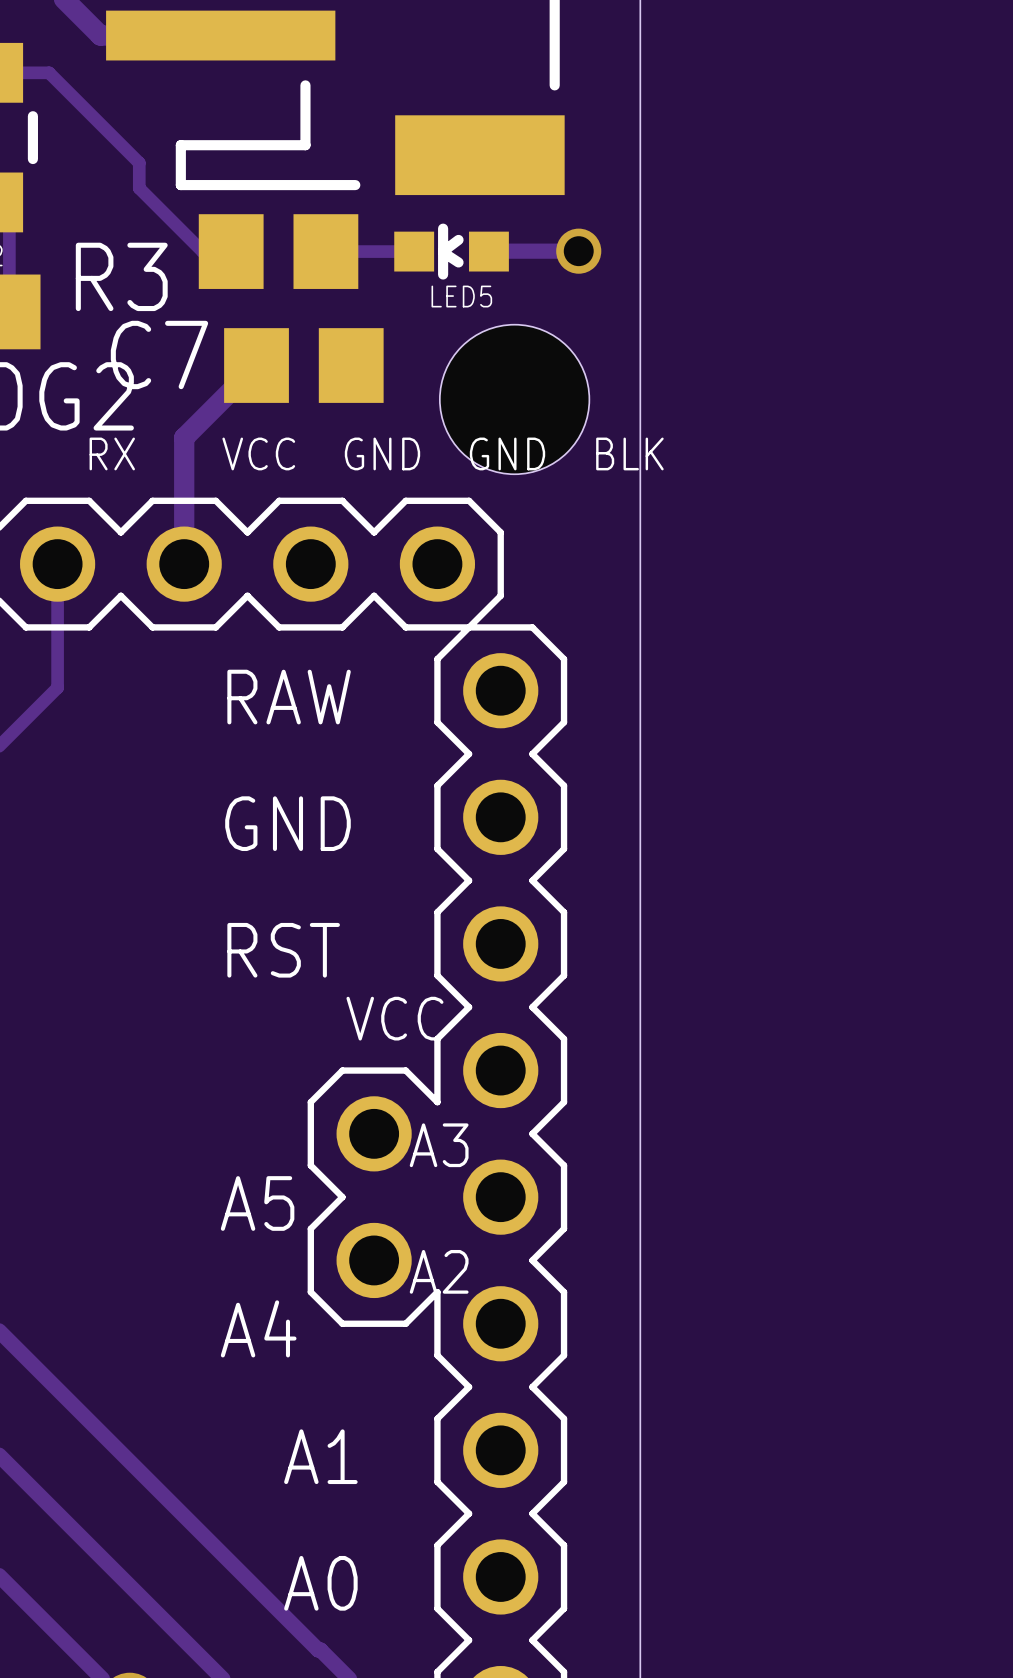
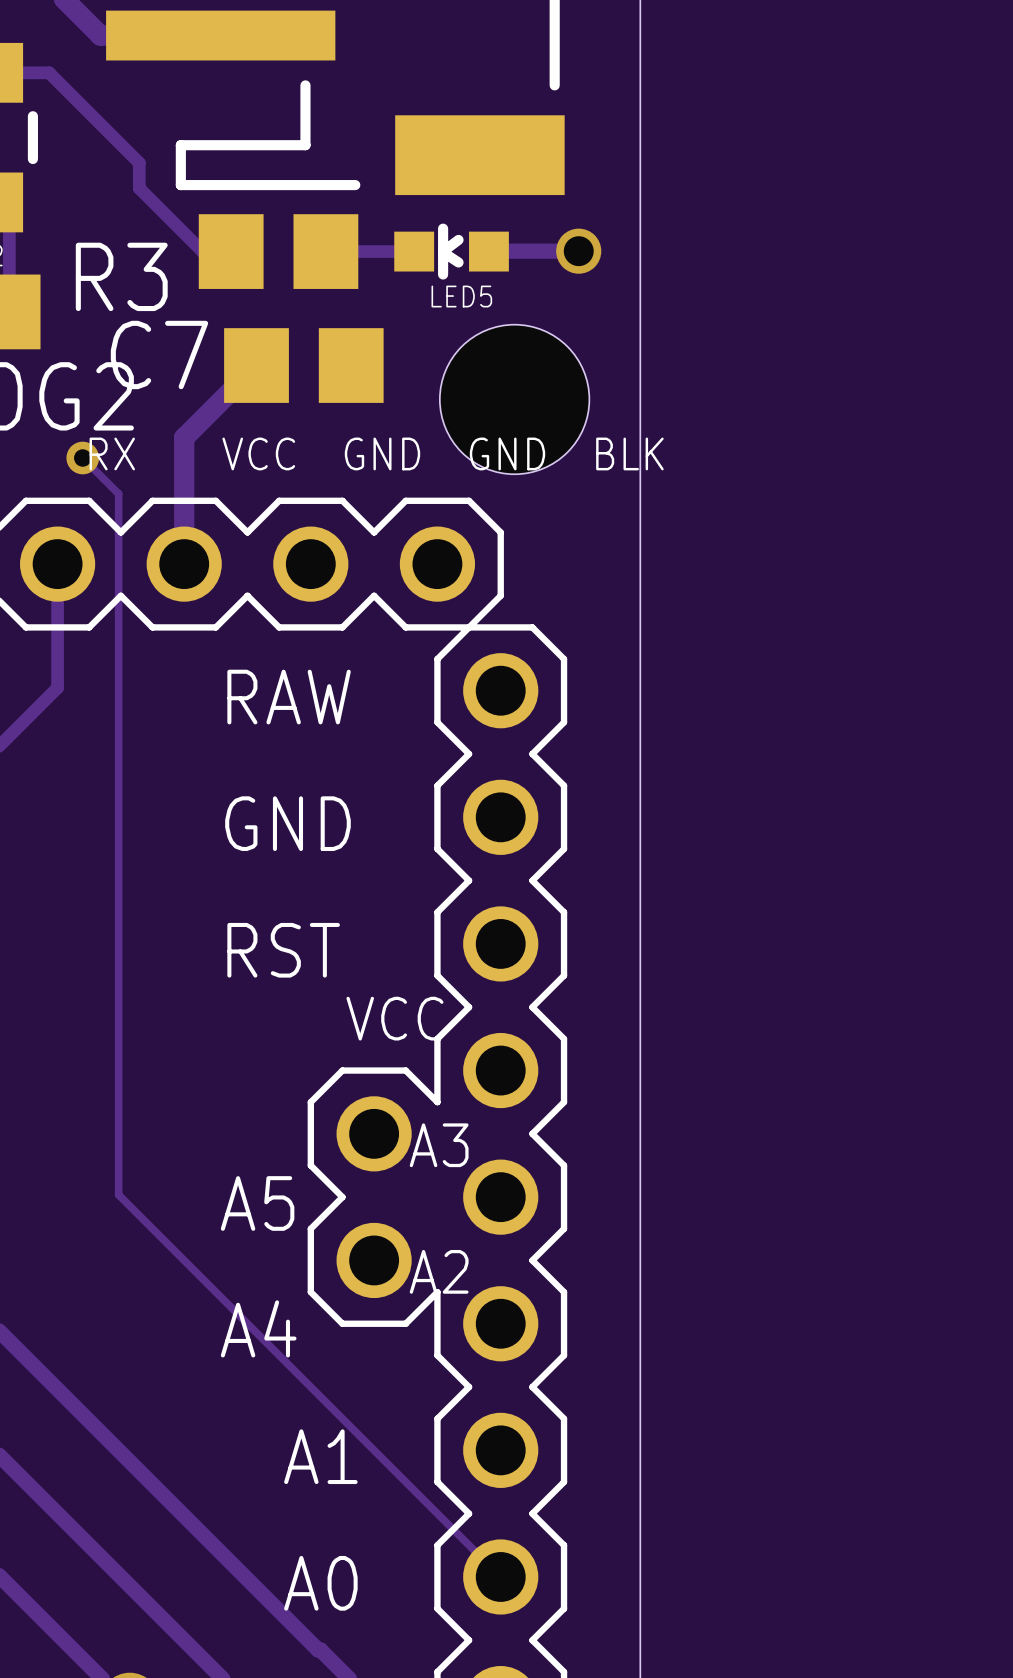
track: none -> (82, 458) (118, 493) (118, 1194) (500, 1576)
via: none -> (82, 458)

